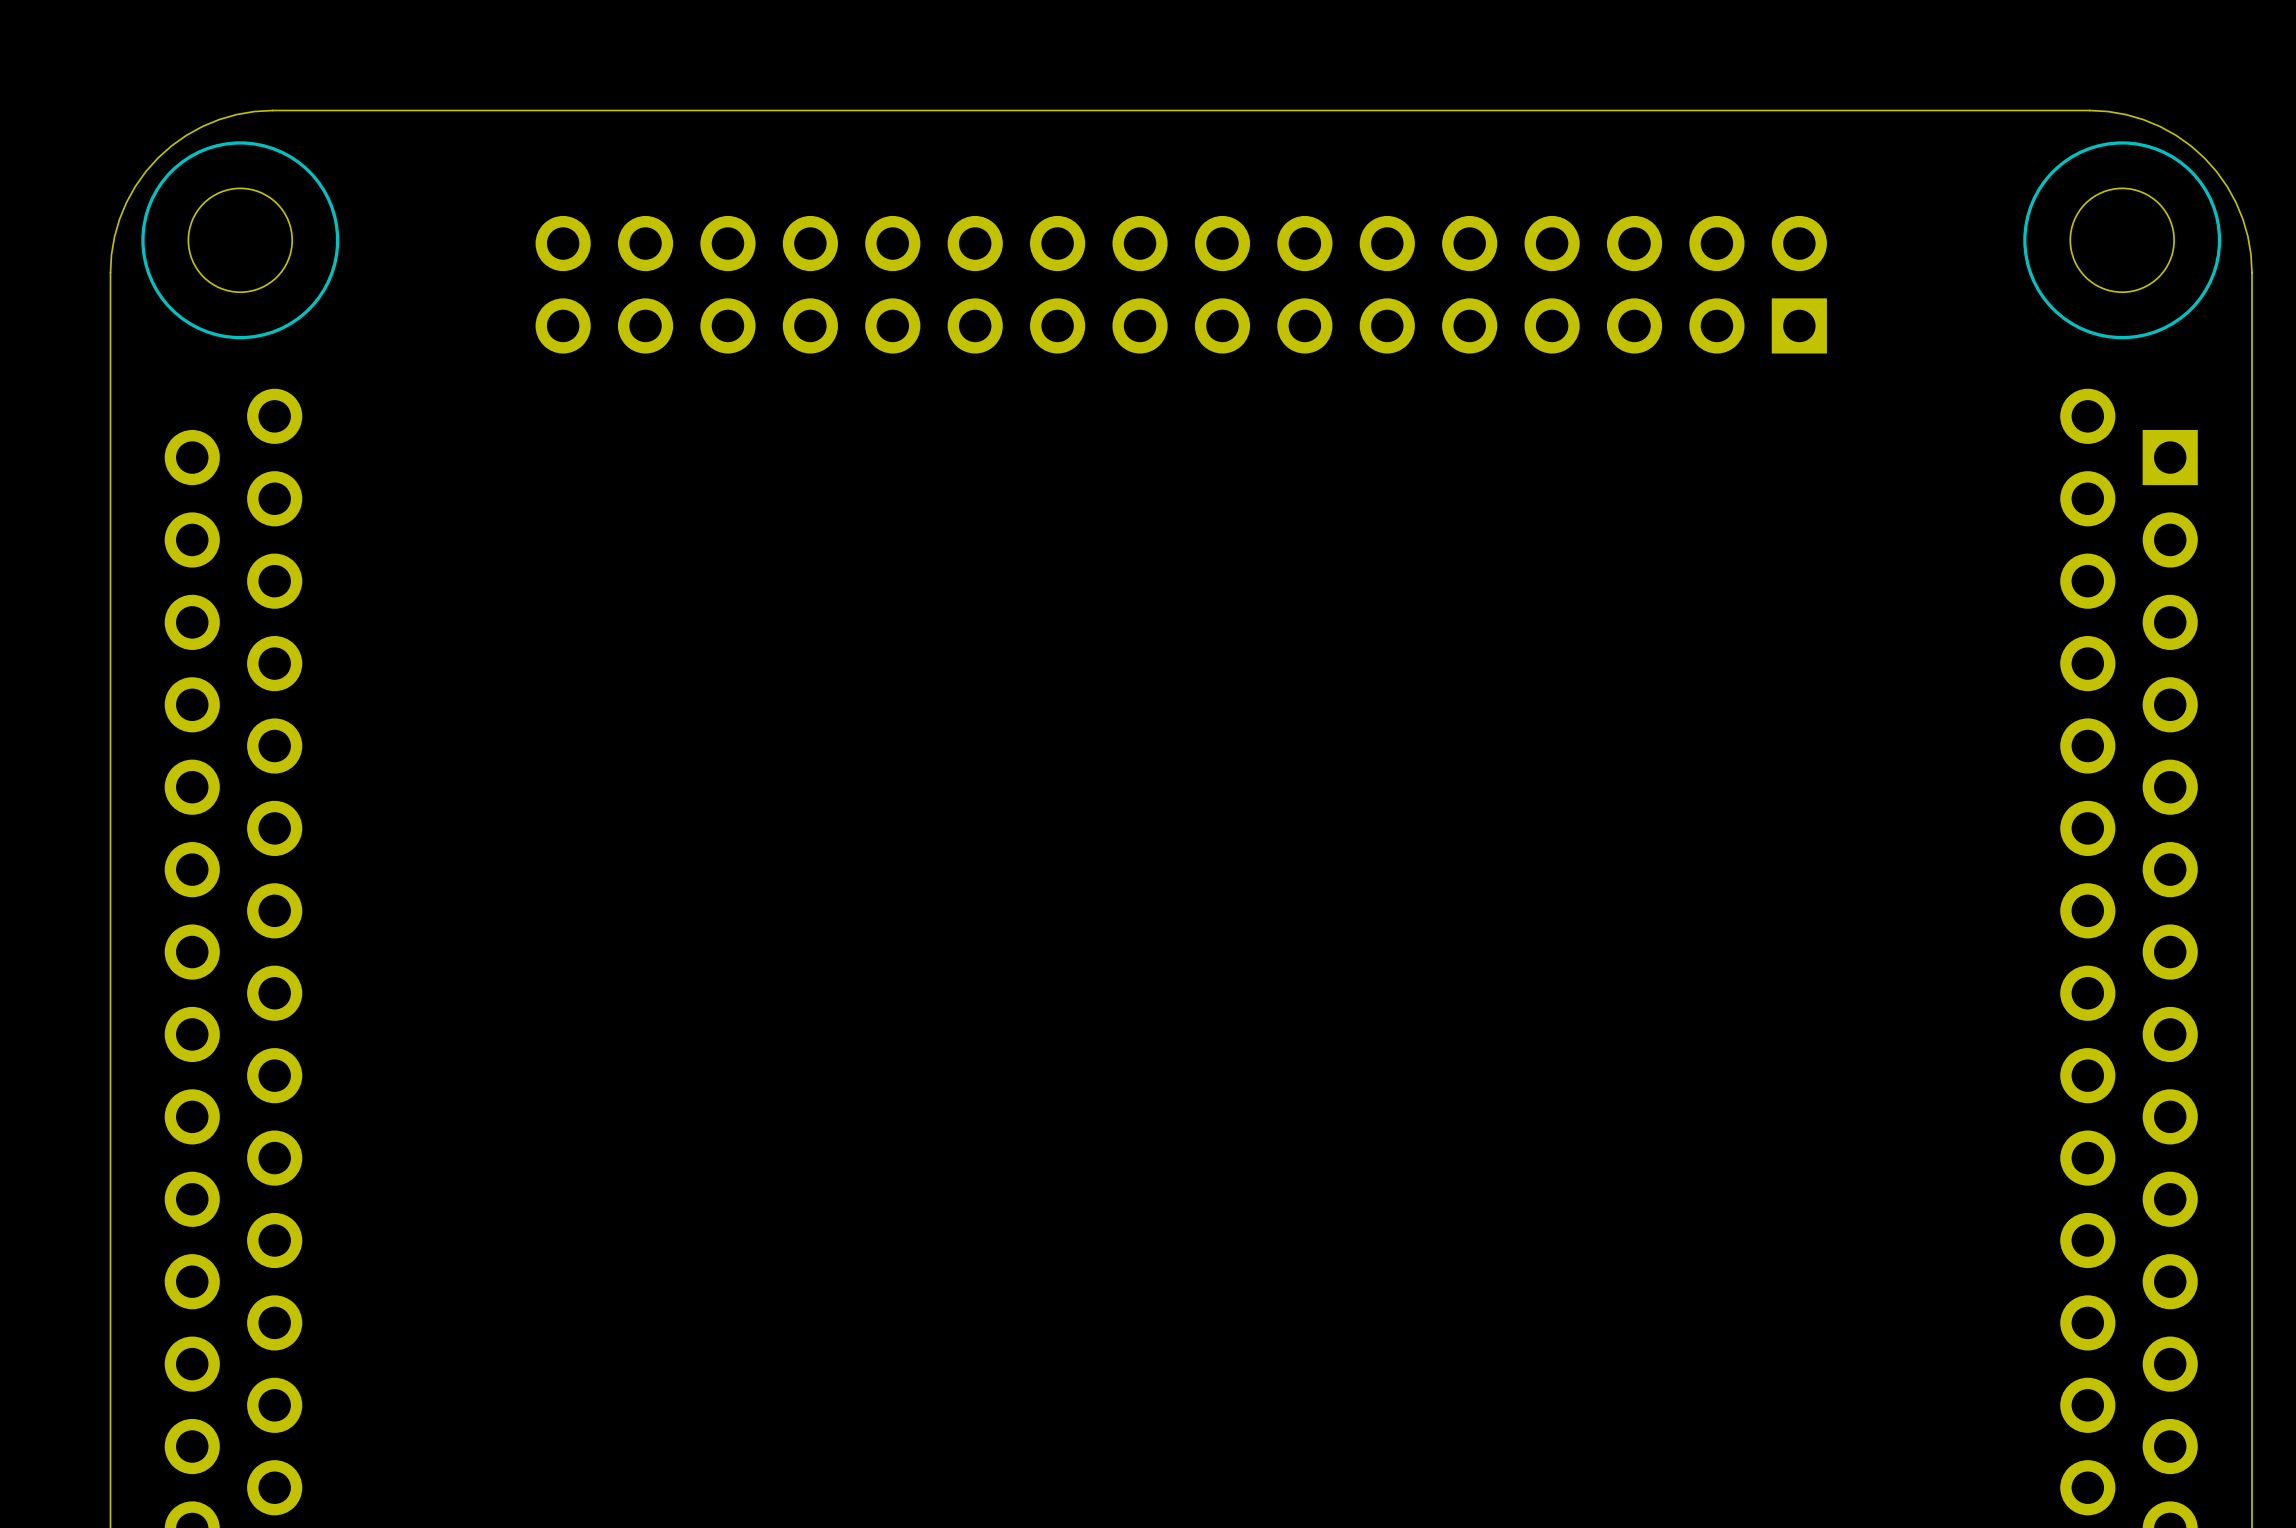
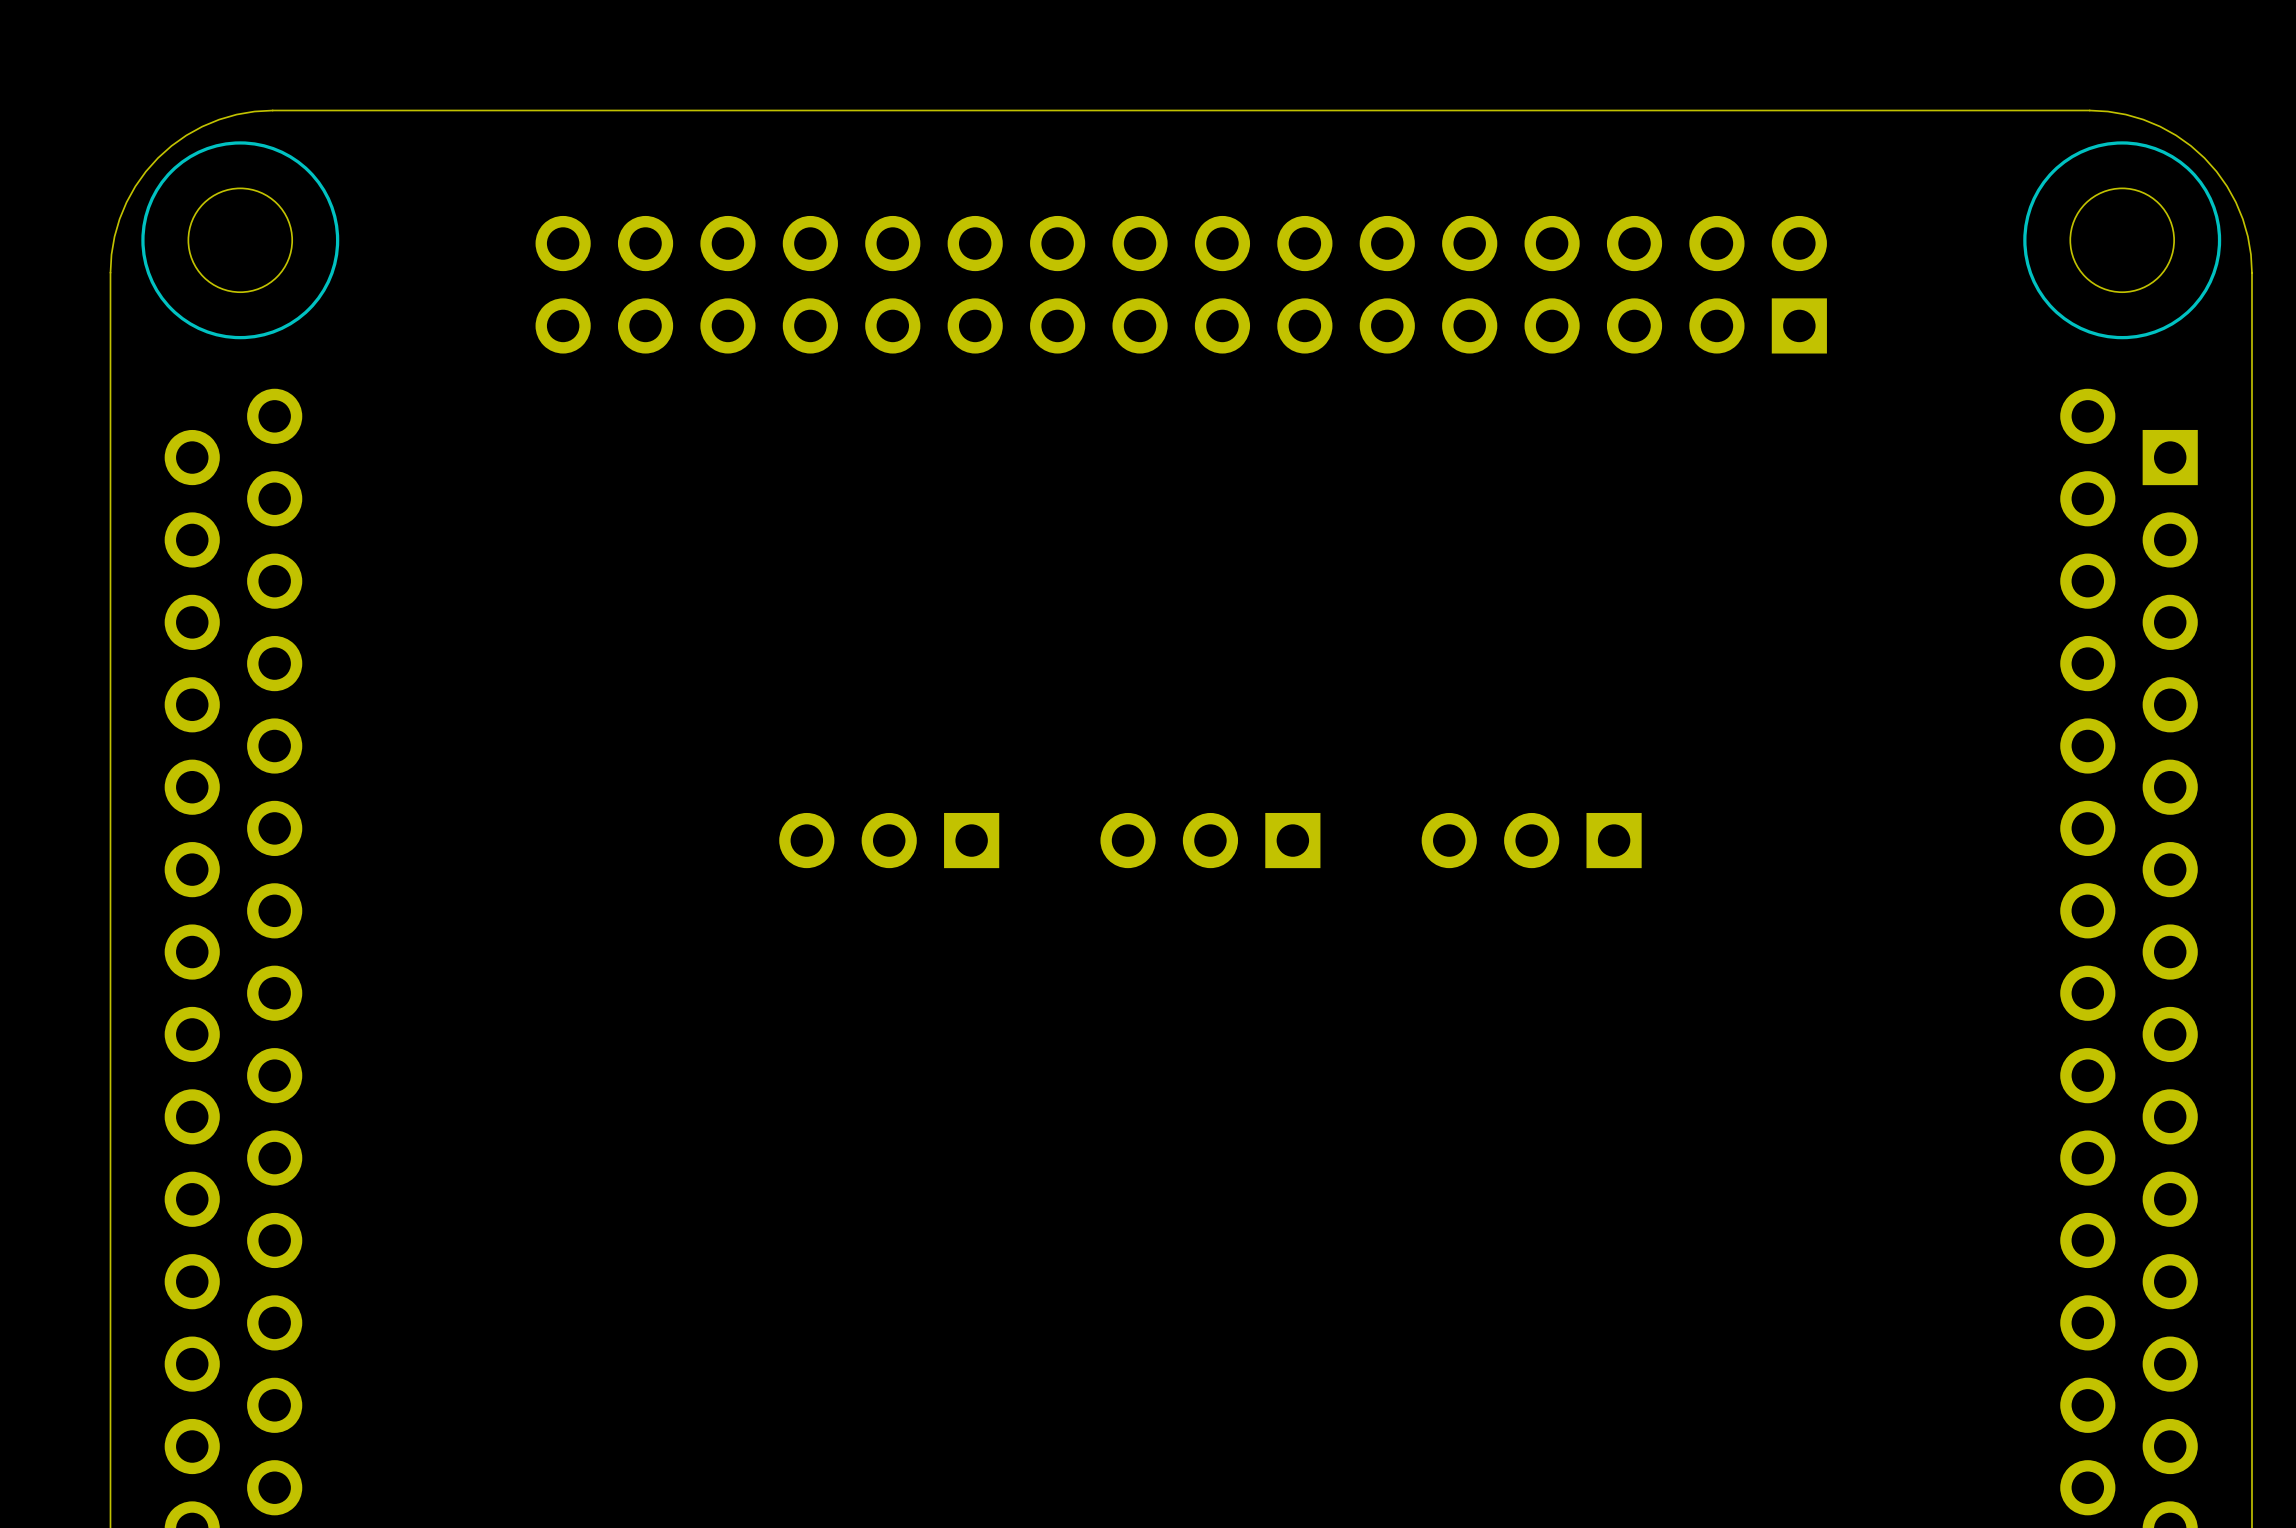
part: none -> (889, 840)
part: none -> (1210, 840)
part: none -> (1531, 840)

